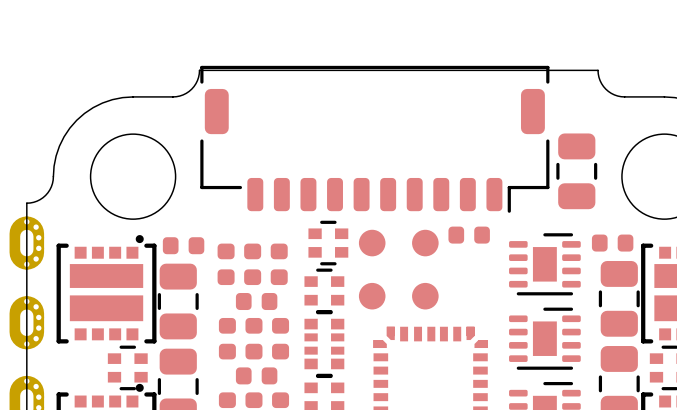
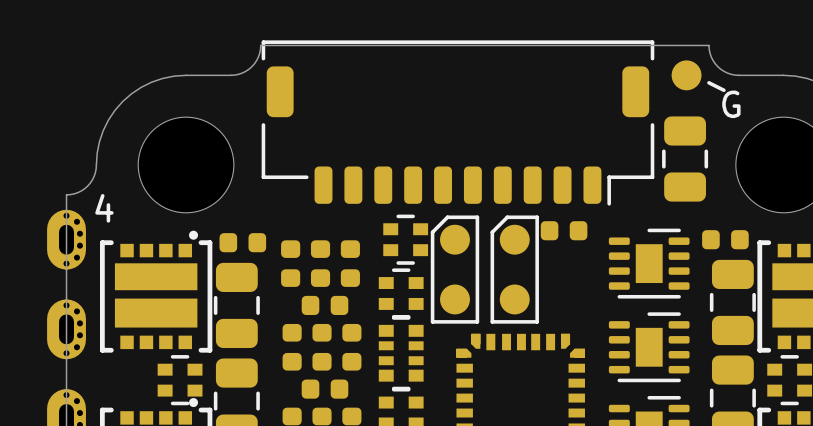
part: none -> (686, 75)
line: none -> (708, 82) (723, 90)
text: none -> G (731, 104)
text: none -> 4 (104, 208)
line: none -> (447, 217) (432, 232) (432, 321) (477, 321) (477, 217) (447, 217)
line: none -> (507, 217) (492, 232) (492, 321) (537, 321) (537, 217) (507, 217)

